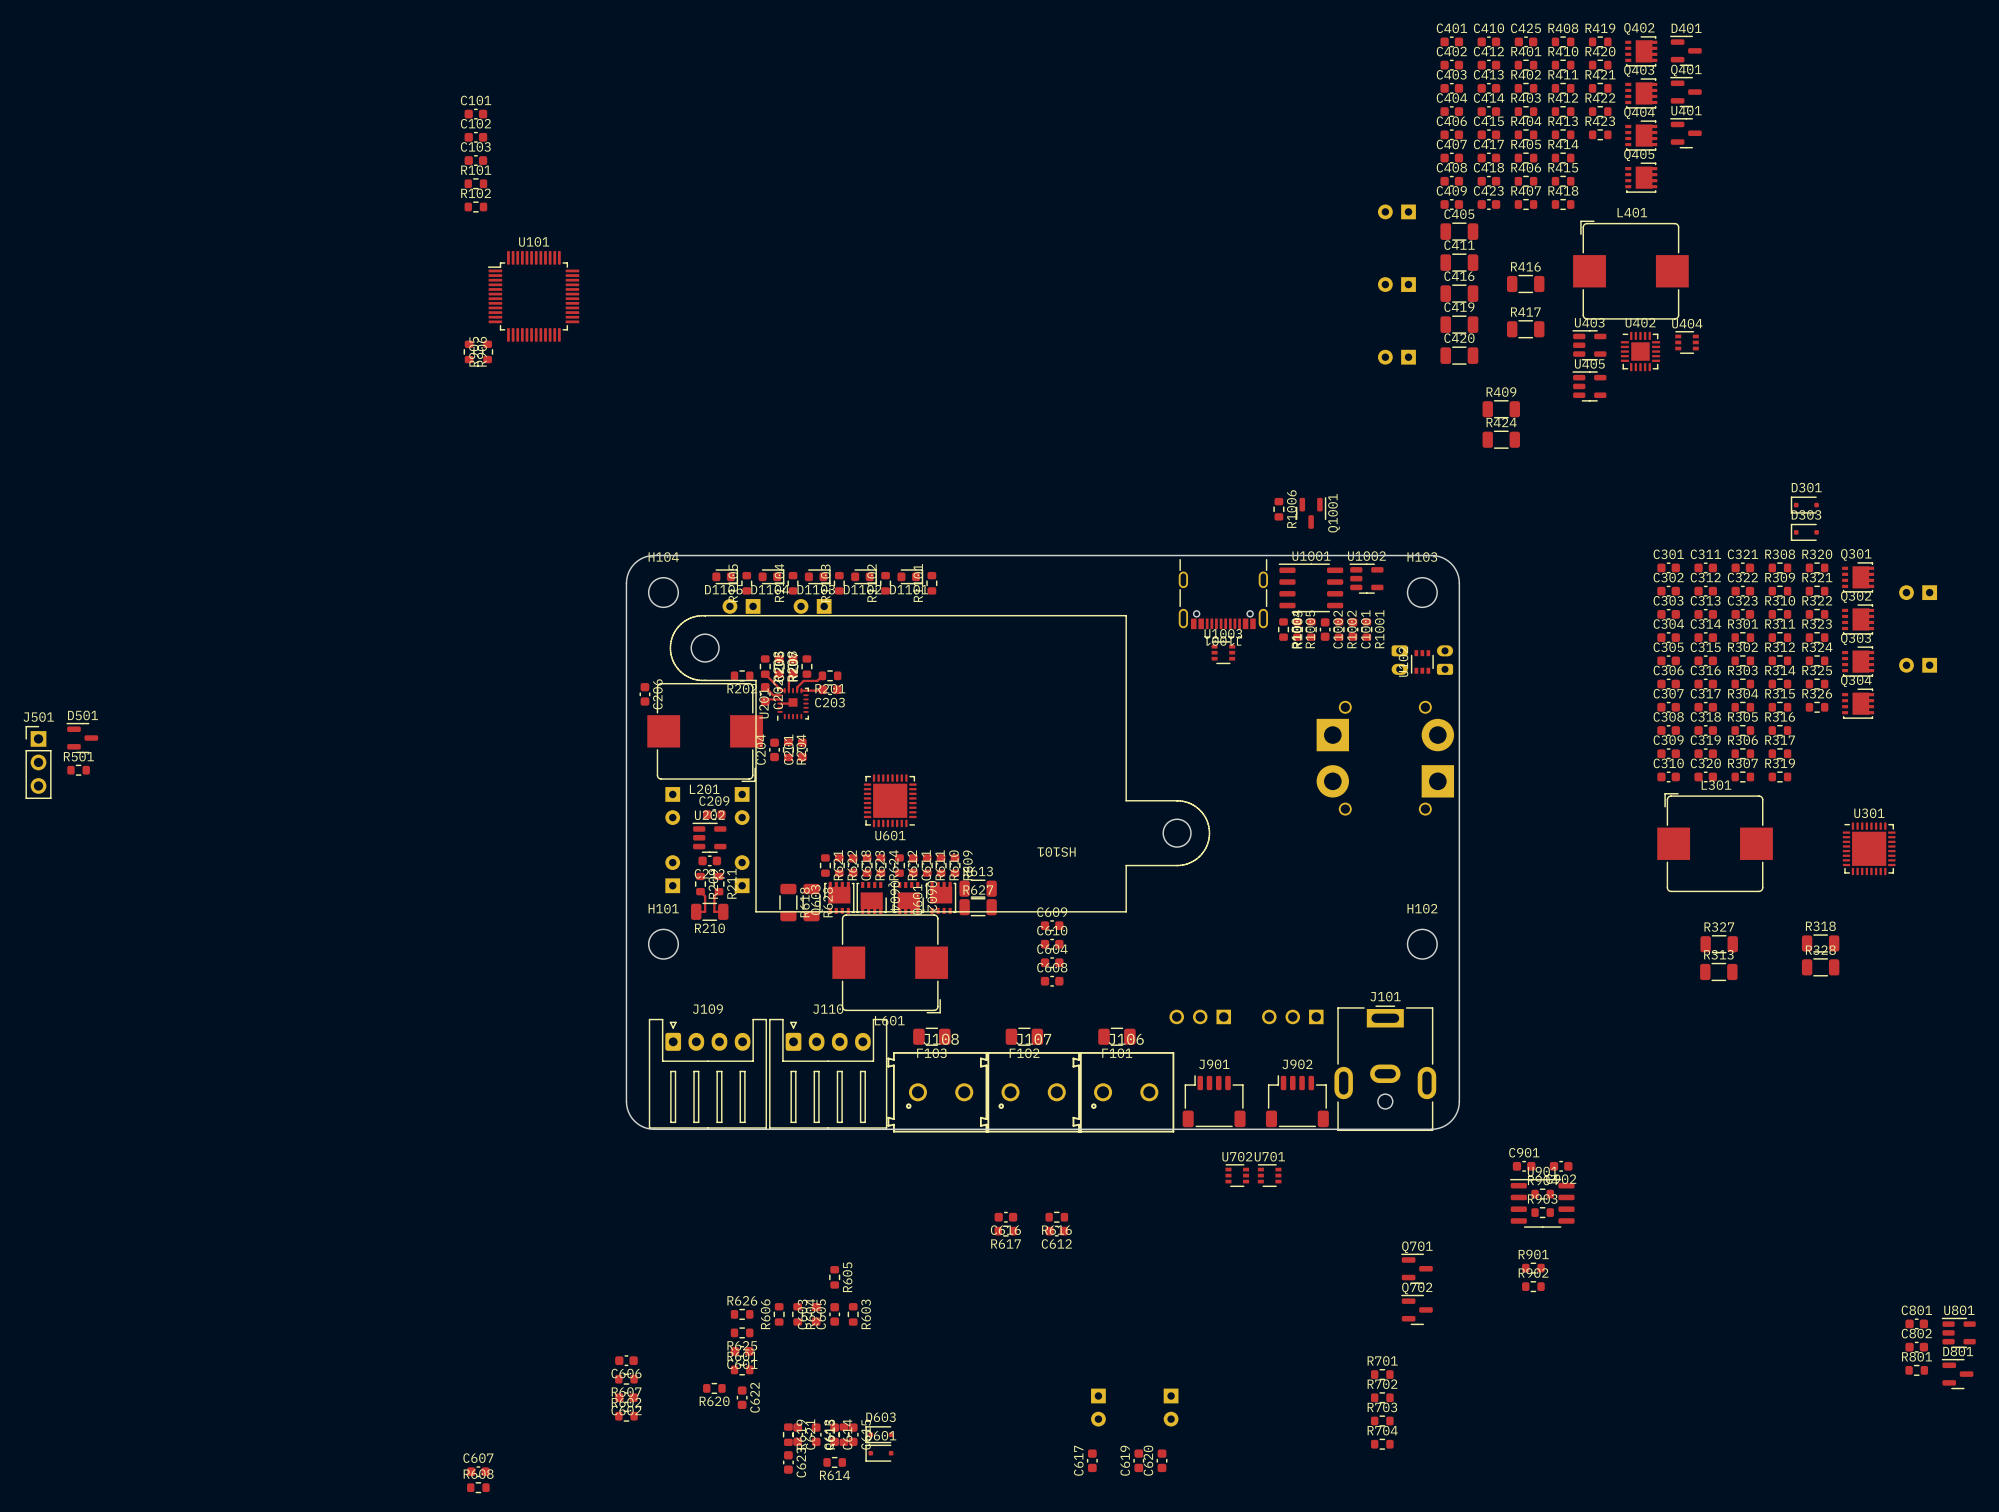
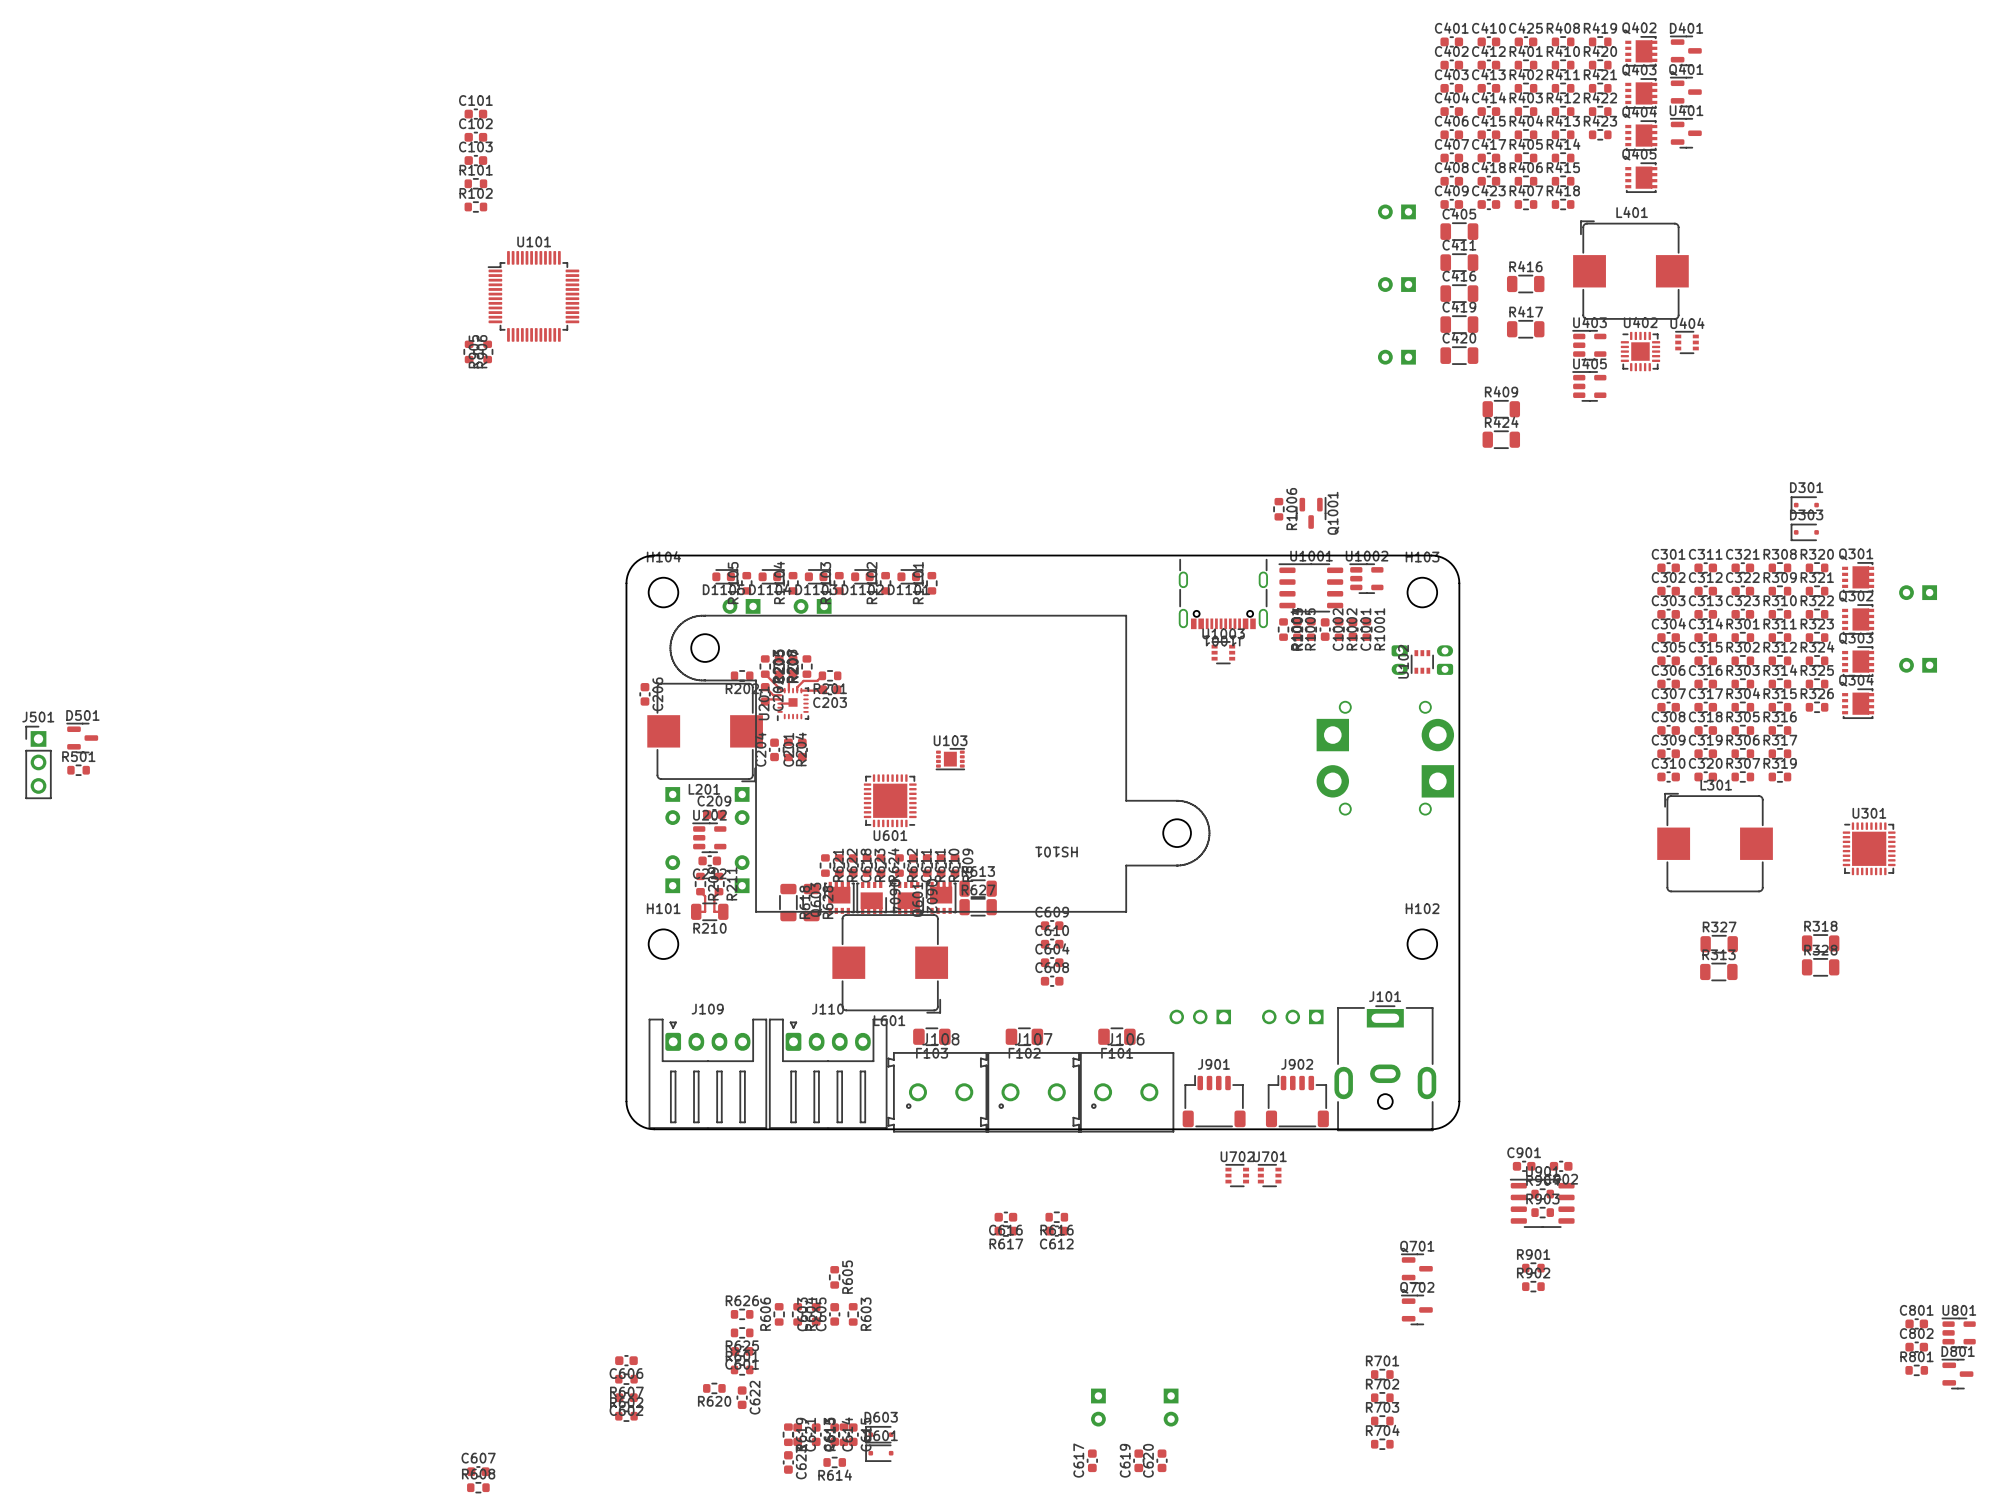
U103: none -> (950, 759)

